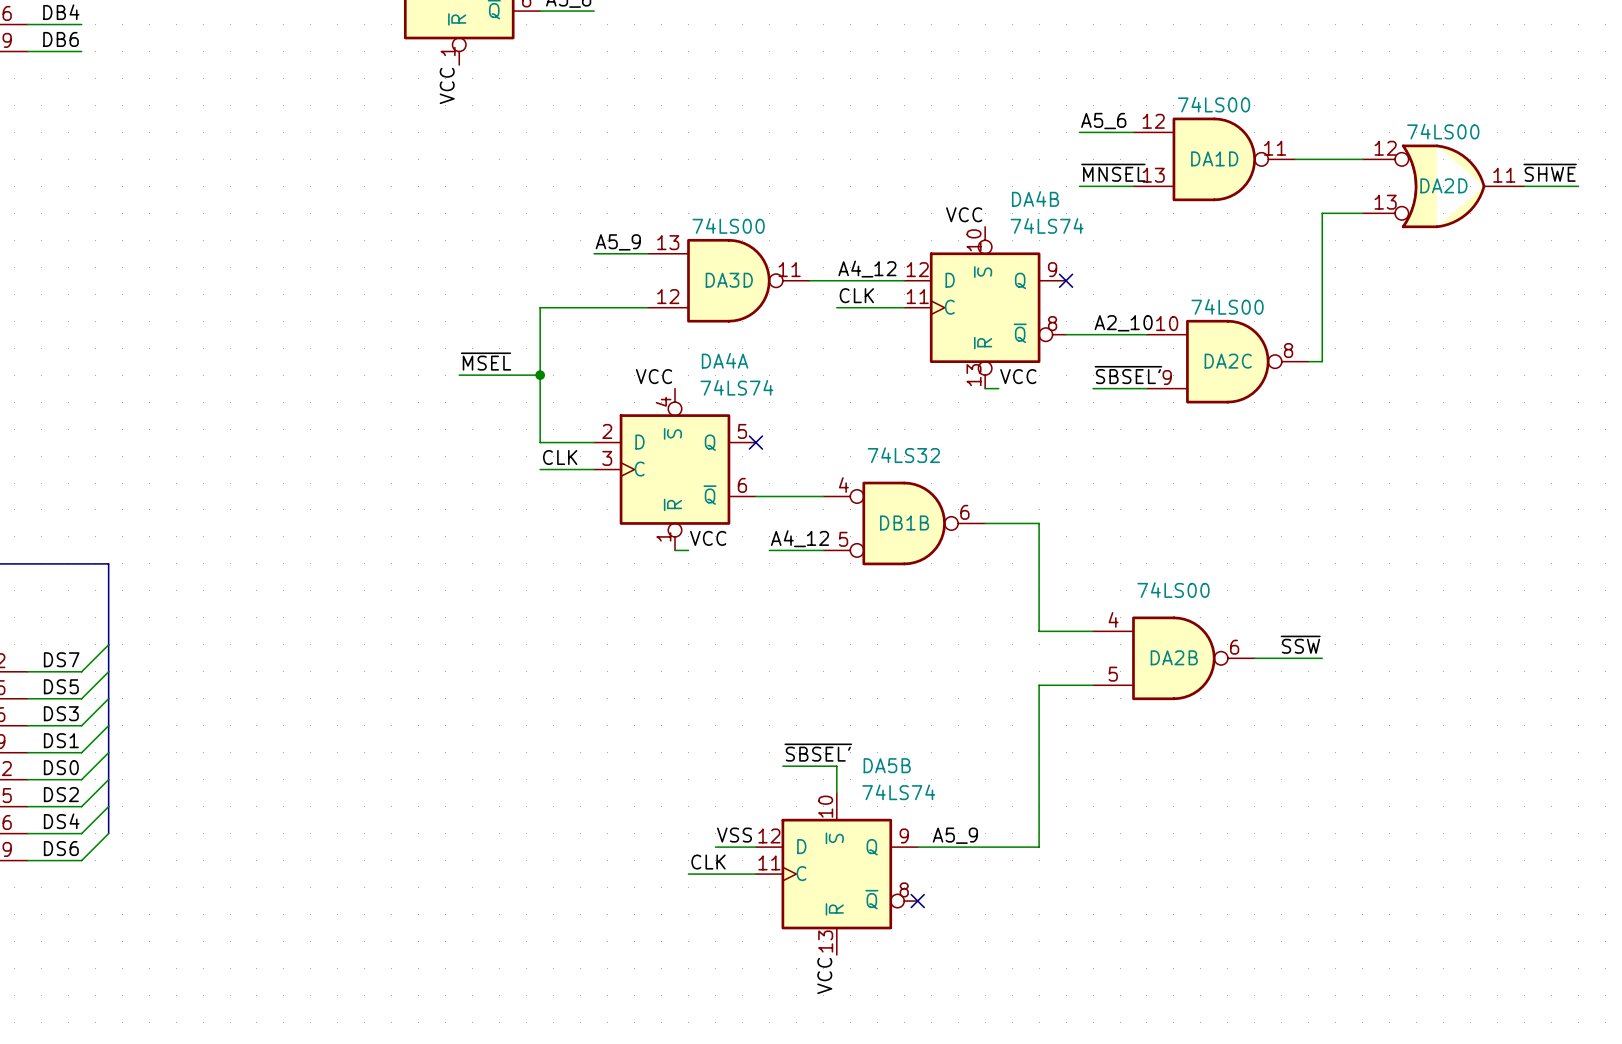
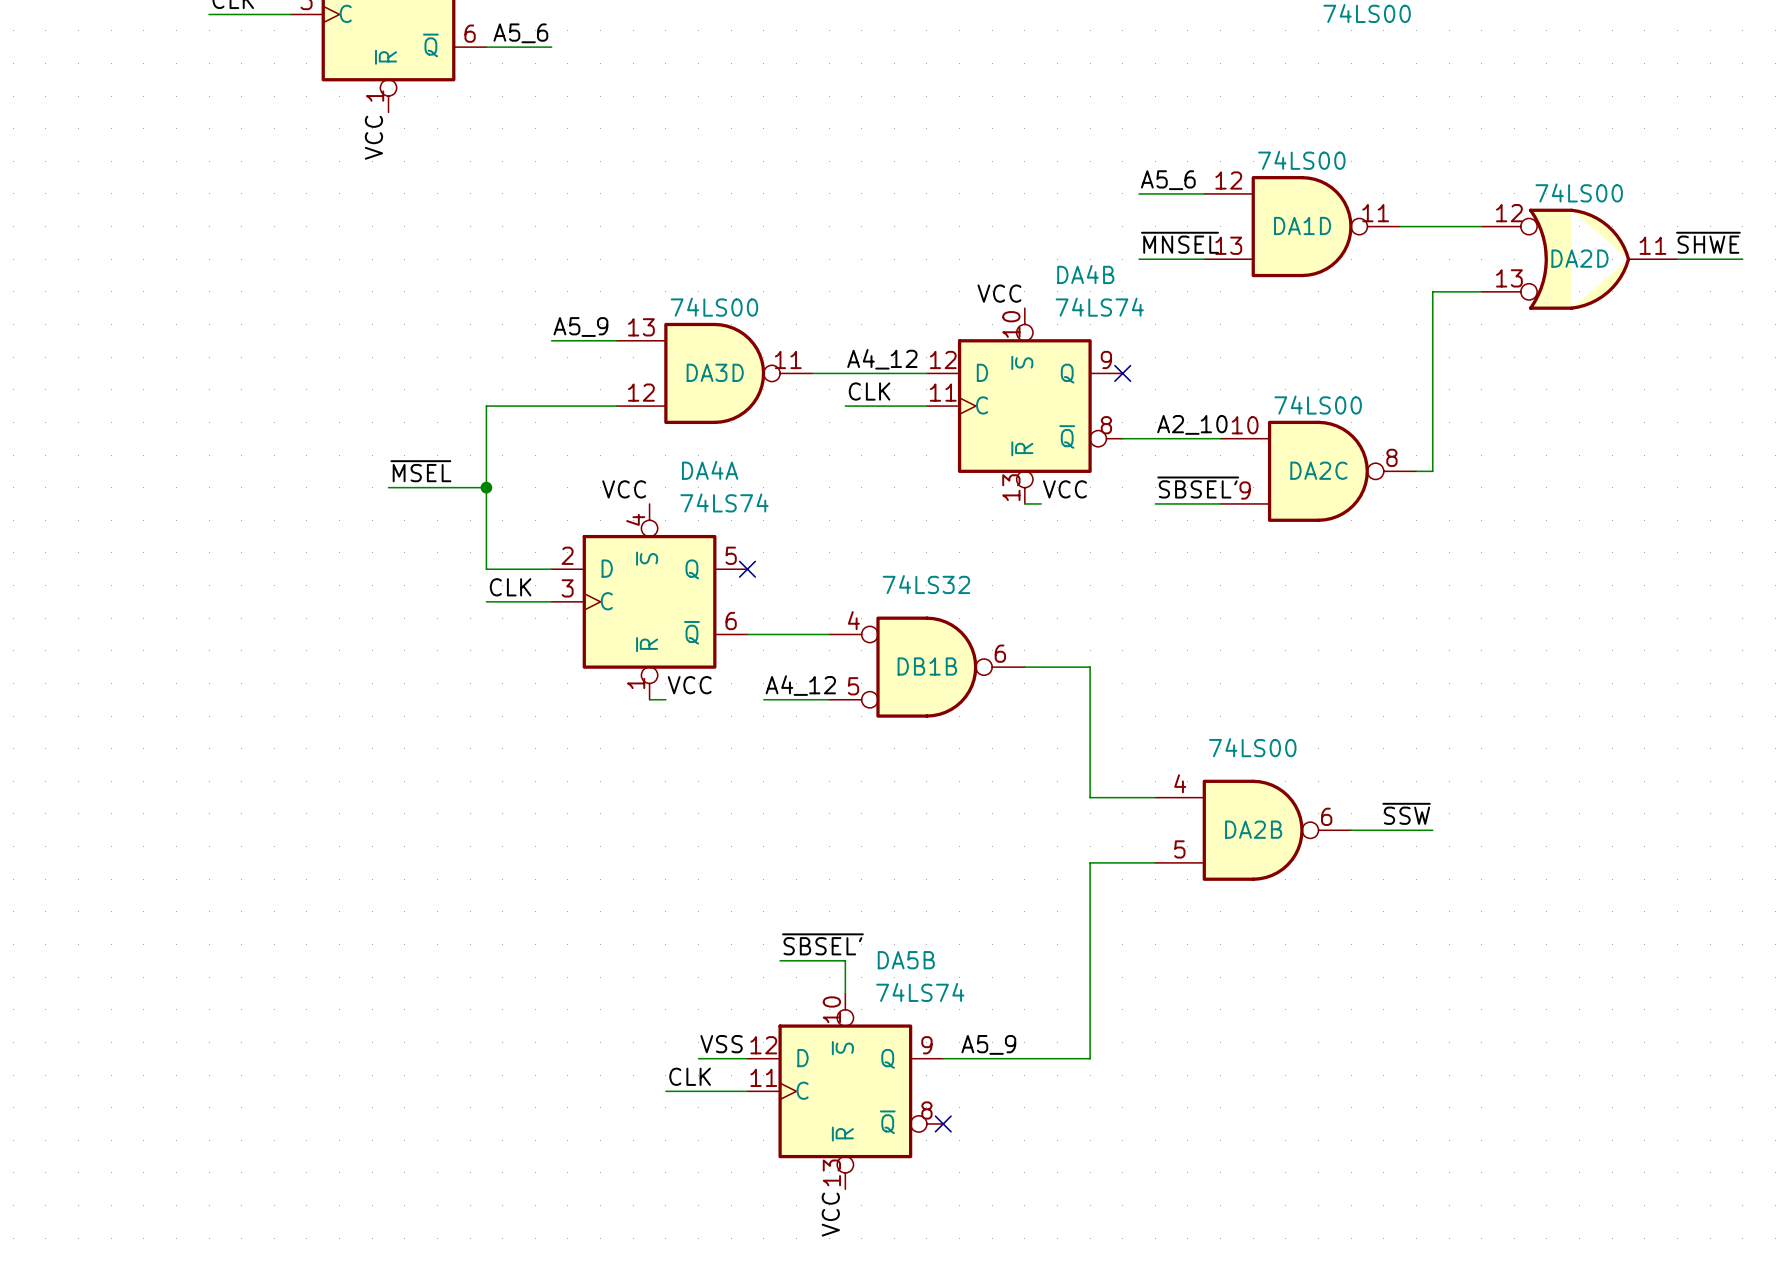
DA5B symbol: [755, 793, 918, 955] -> [747, 993, 944, 1190]

